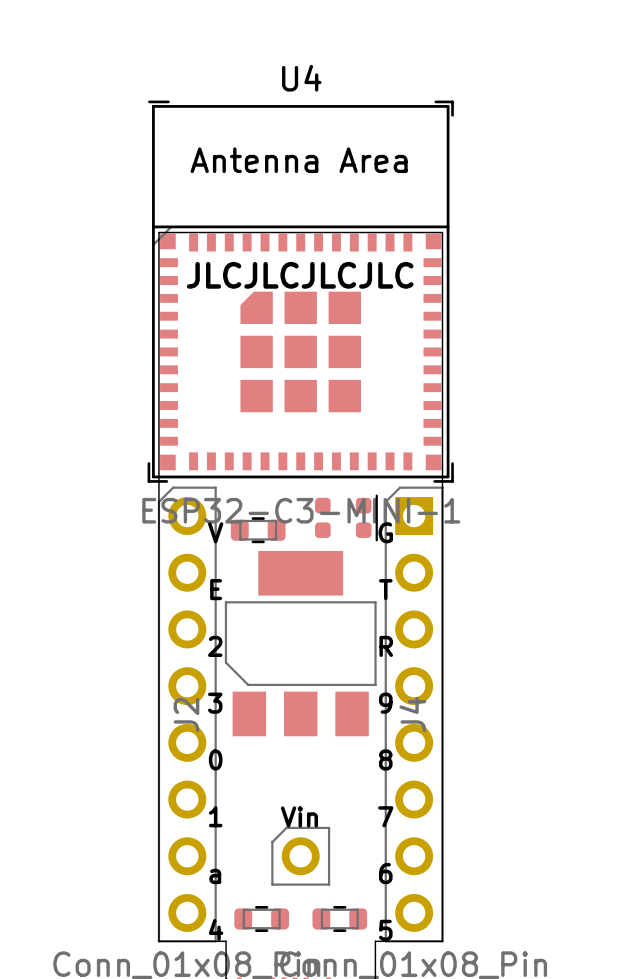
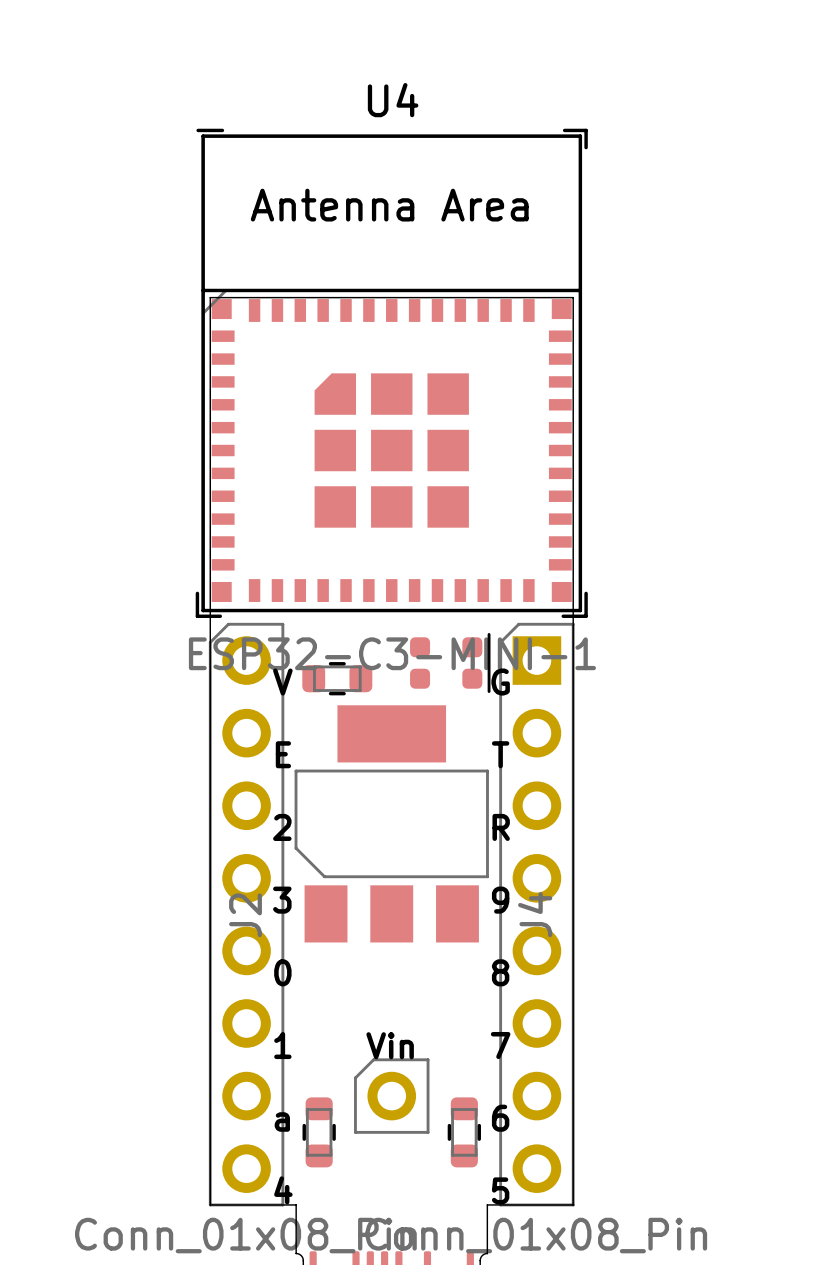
text: JLCJLCJLCJLC (300, 275) -> none
part rotation: 0° (261, 918) -> 90° clockwise (319, 1132)
part position: (261, 918) -> (319, 1132)
part rotation: 0° (339, 918) -> 90° clockwise (464, 1132)
part position: (339, 918) -> (464, 1132)

